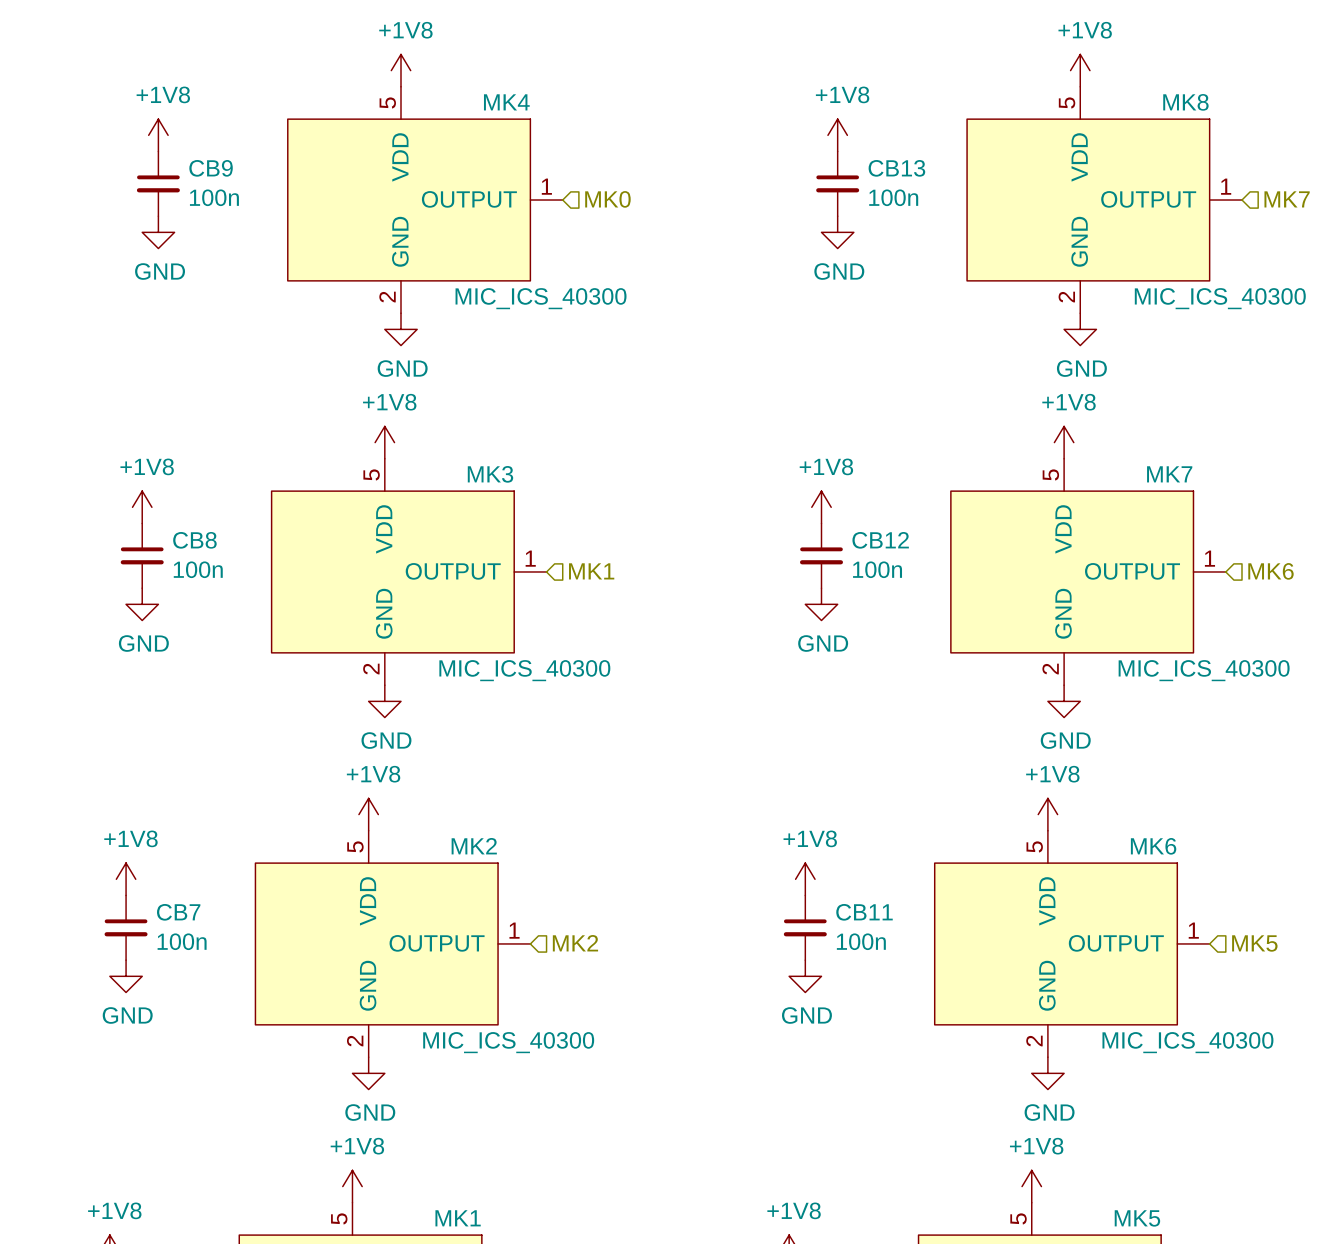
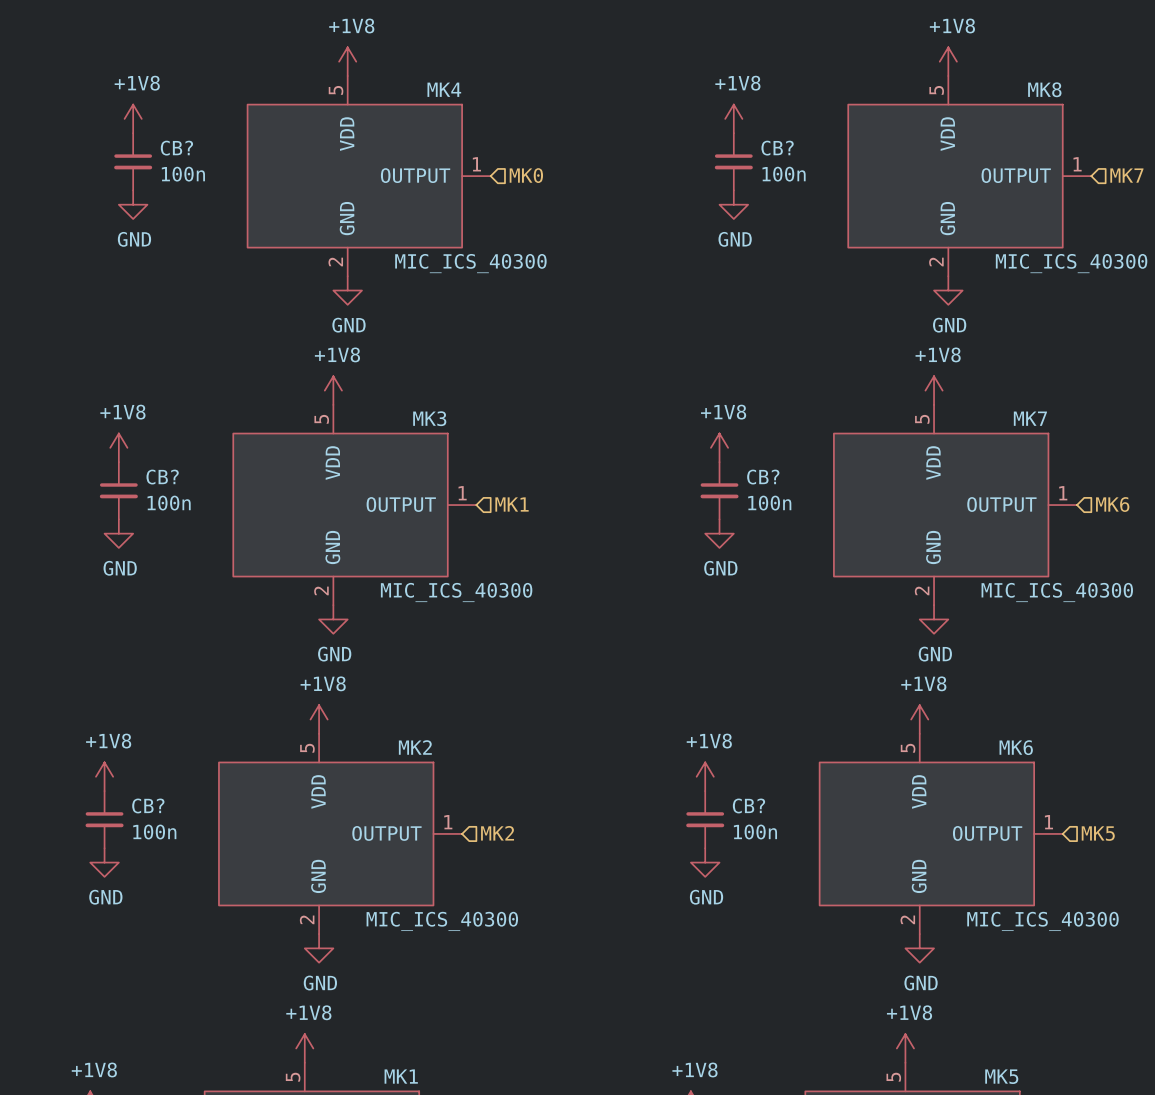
CB9 name: CB9 (211, 168) -> CB? (176, 148)
CB13 name: CB13 (896, 168) -> CB? (777, 148)
CB8 name: CB8 (194, 540) -> CB? (162, 477)
CB12 name: CB12 (880, 540) -> CB? (763, 477)
CB7 name: CB7 (178, 912) -> CB? (148, 805)
CB11 name: CB11 (864, 912) -> CB? (748, 805)

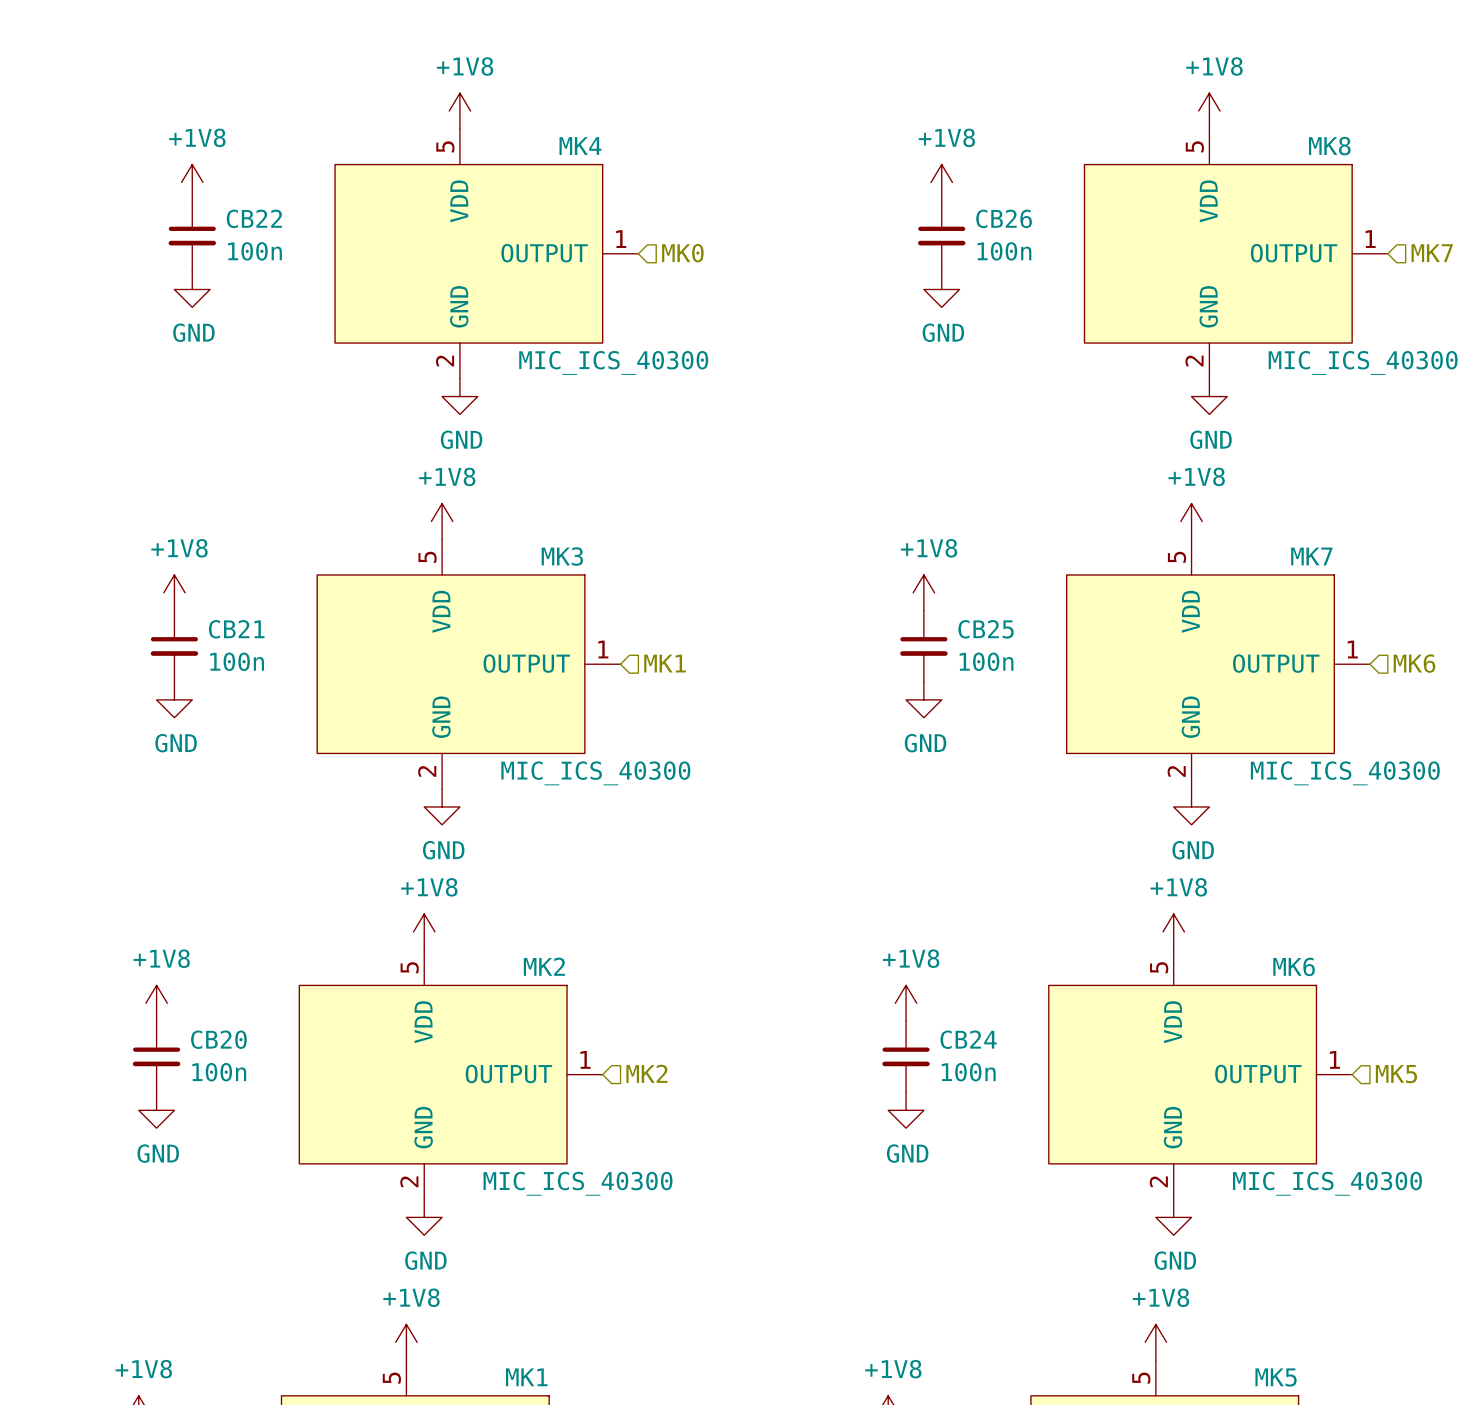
CB? name: CB? (176, 148) -> CB22 (254, 218)
CB? name: CB? (777, 148) -> CB26 (1004, 218)
CB? name: CB? (162, 477) -> CB21 (236, 629)
CB? name: CB? (763, 477) -> CB25 (986, 629)
CB? name: CB? (148, 805) -> CB20 (218, 1039)
CB? name: CB? (748, 805) -> CB24 (968, 1039)

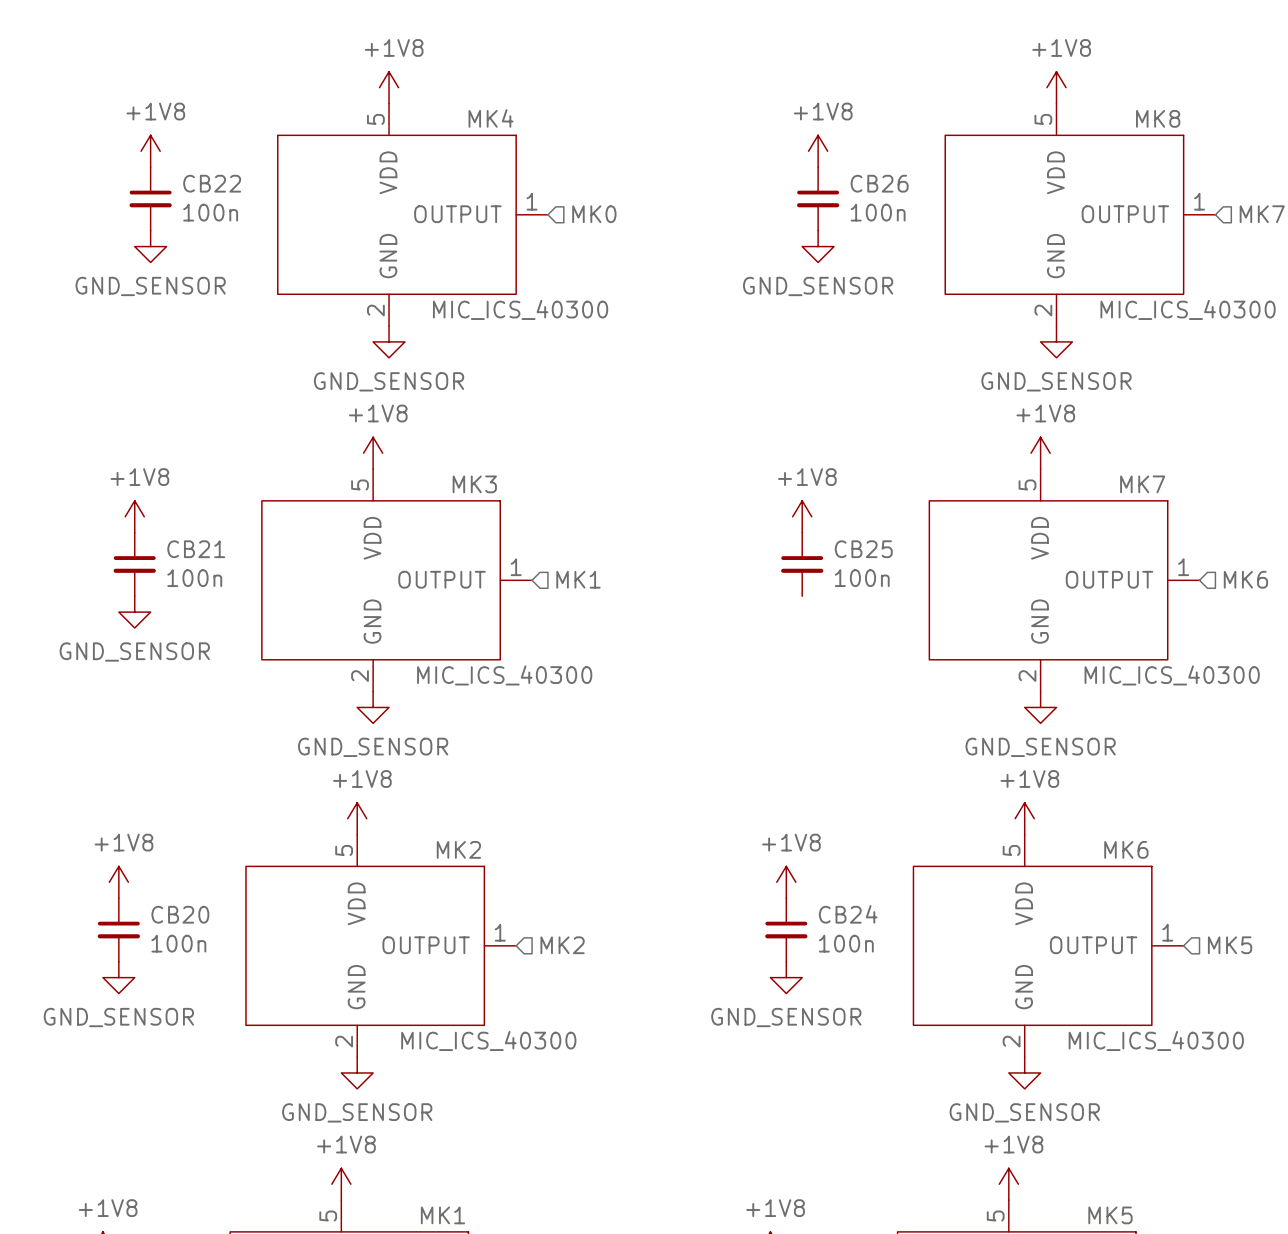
power symbol: GND (192, 289) -> GND_SENSOR (150, 246)
power symbol: GND (941, 289) -> GND_SENSOR (818, 246)
power symbol: GND (459, 396) -> GND_SENSOR (389, 341)
power symbol: GND (1209, 396) -> GND_SENSOR (1056, 341)
power symbol: GND (174, 699) -> GND_SENSOR (134, 612)
power symbol: GND (923, 699) -> none
power symbol: GND (442, 806) -> GND_SENSOR (373, 707)
power symbol: GND (1191, 806) -> GND_SENSOR (1040, 707)
power symbol: GND (156, 1110) -> GND_SENSOR (118, 977)
power symbol: GND (906, 1110) -> GND_SENSOR (786, 977)
power symbol: GND (424, 1217) -> GND_SENSOR (357, 1072)
power symbol: GND (1173, 1217) -> GND_SENSOR (1024, 1072)

